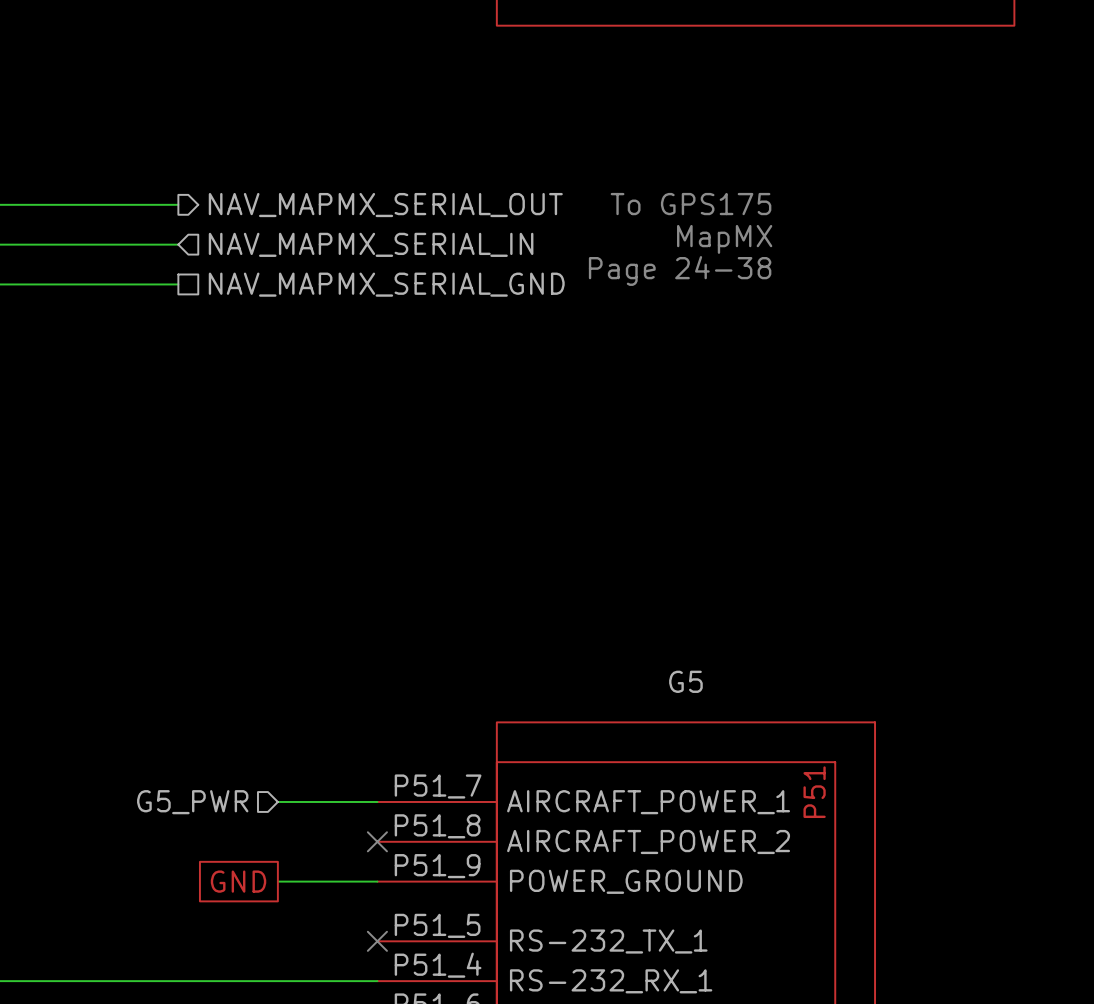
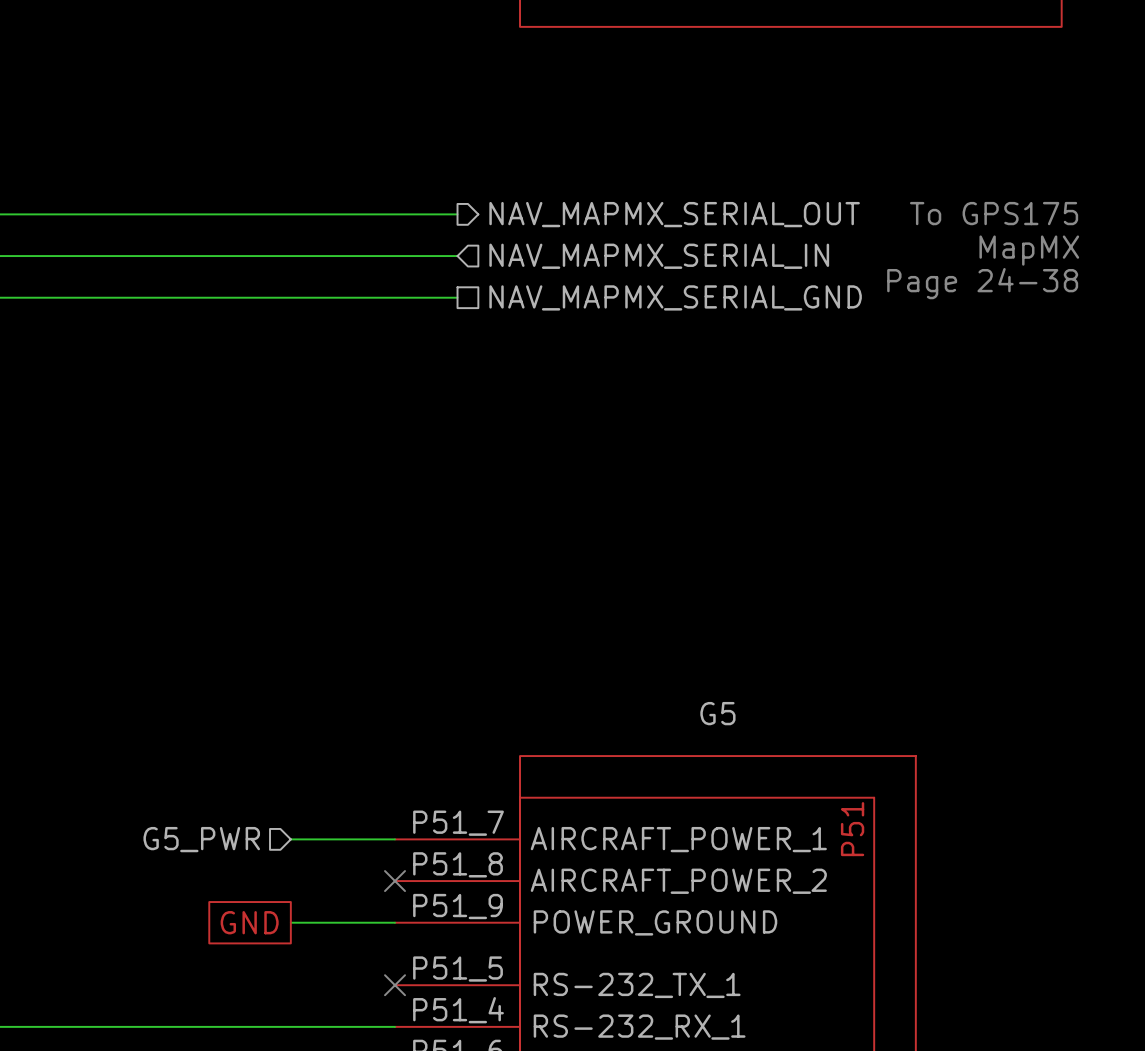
wire: none -> (186, 214) (457, 214)
text position: To GPS175 (691, 204) -> To GPS175 (994, 213)
hierarchical label position: NAV_MAPMX_SERIAL_OUT (385, 205) -> NAV_MAPMX_SERIAL_OUT (674, 214)
text position: MapMX (724, 239) -> MapMX (1029, 250)
wire: none -> (186, 256) (457, 256)
hierarchical label position: NAV_MAPMX_SERIAL_IN (371, 244) -> NAV_MAPMX_SERIAL_IN (659, 256)
text position: Page 24-38 (680, 270) -> Page 24-38 (982, 283)
wire: none -> (186, 297) (457, 297)
hierarchical label position: NAV_MAPMX_SERIAL_GND (386, 284) -> NAV_MAPMX_SERIAL_GND (675, 297)

